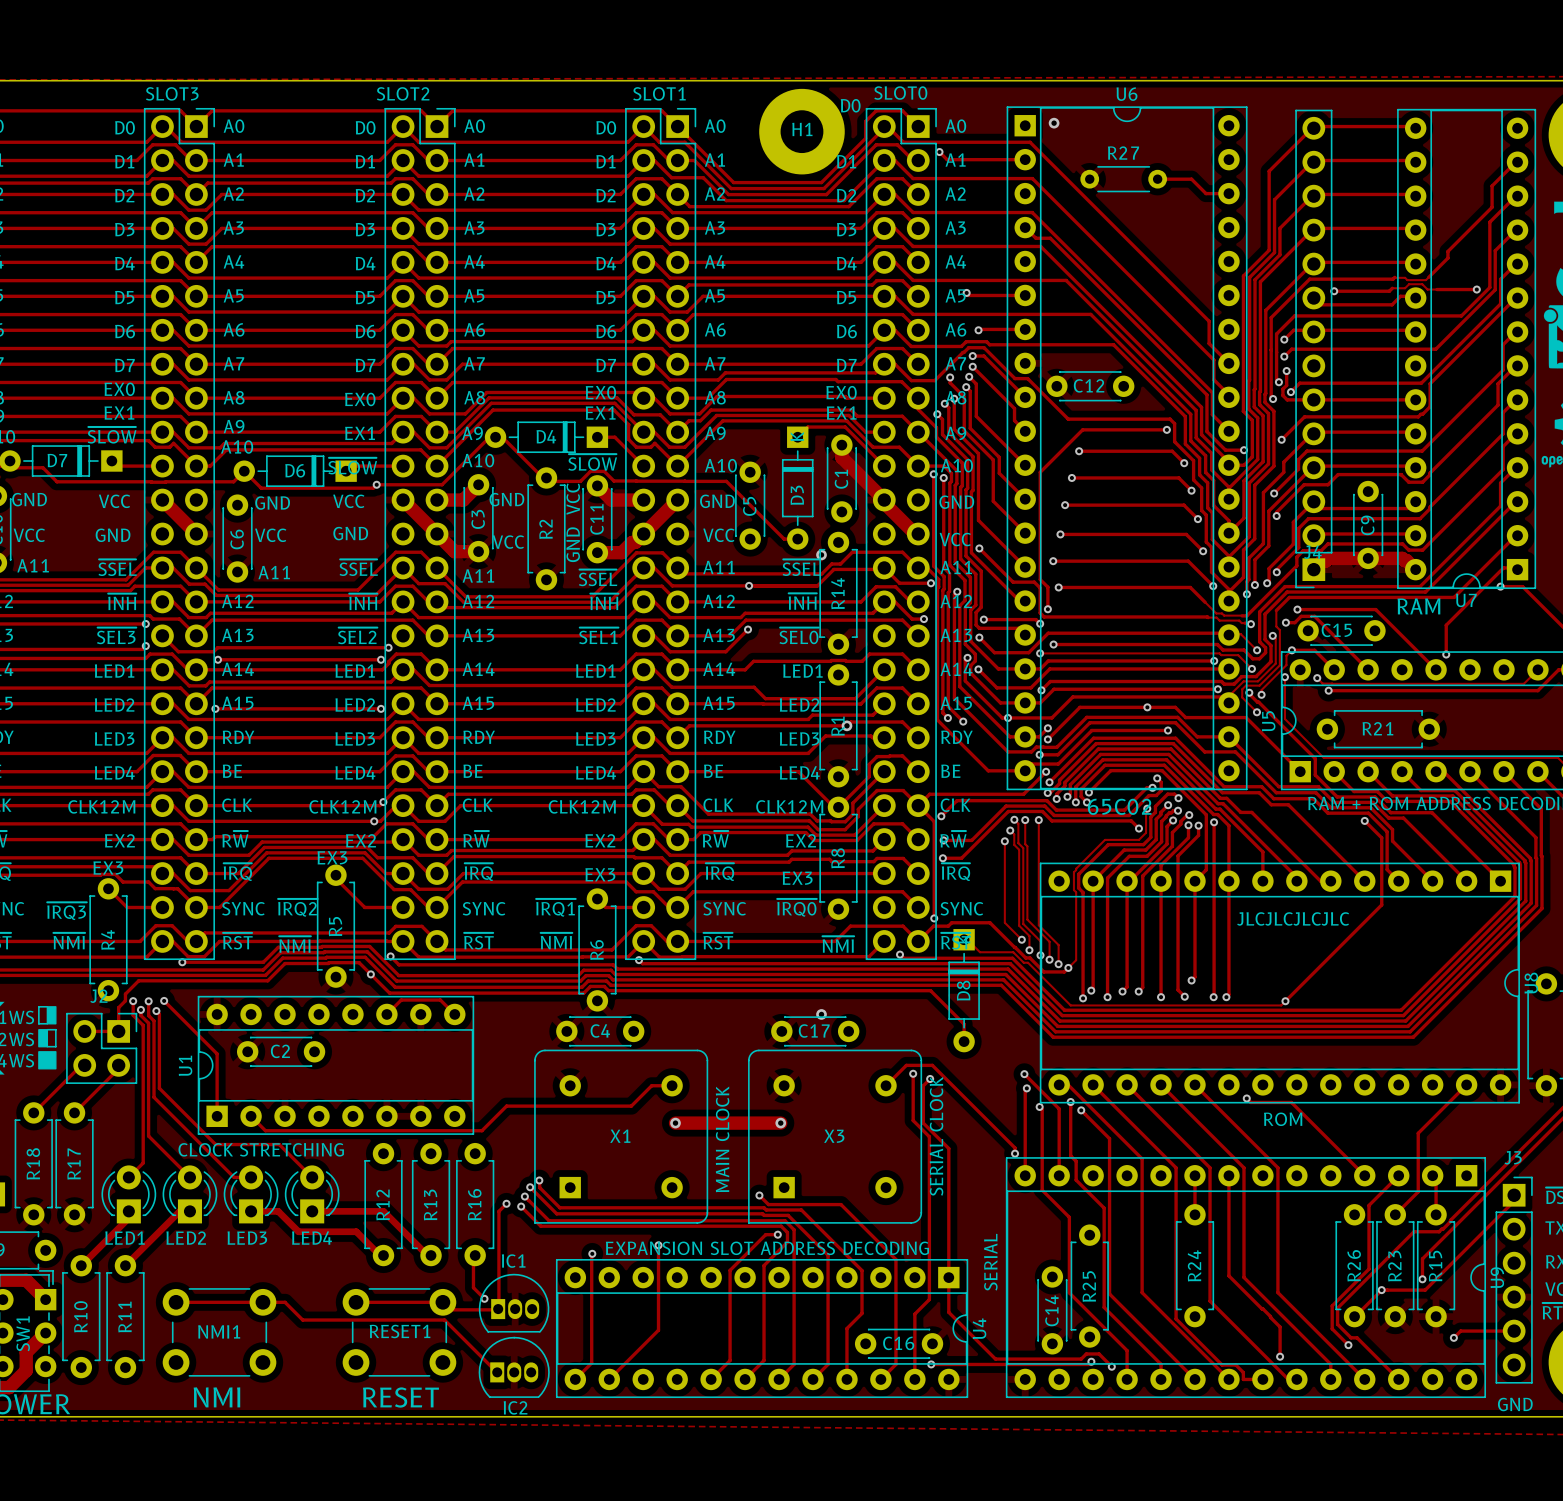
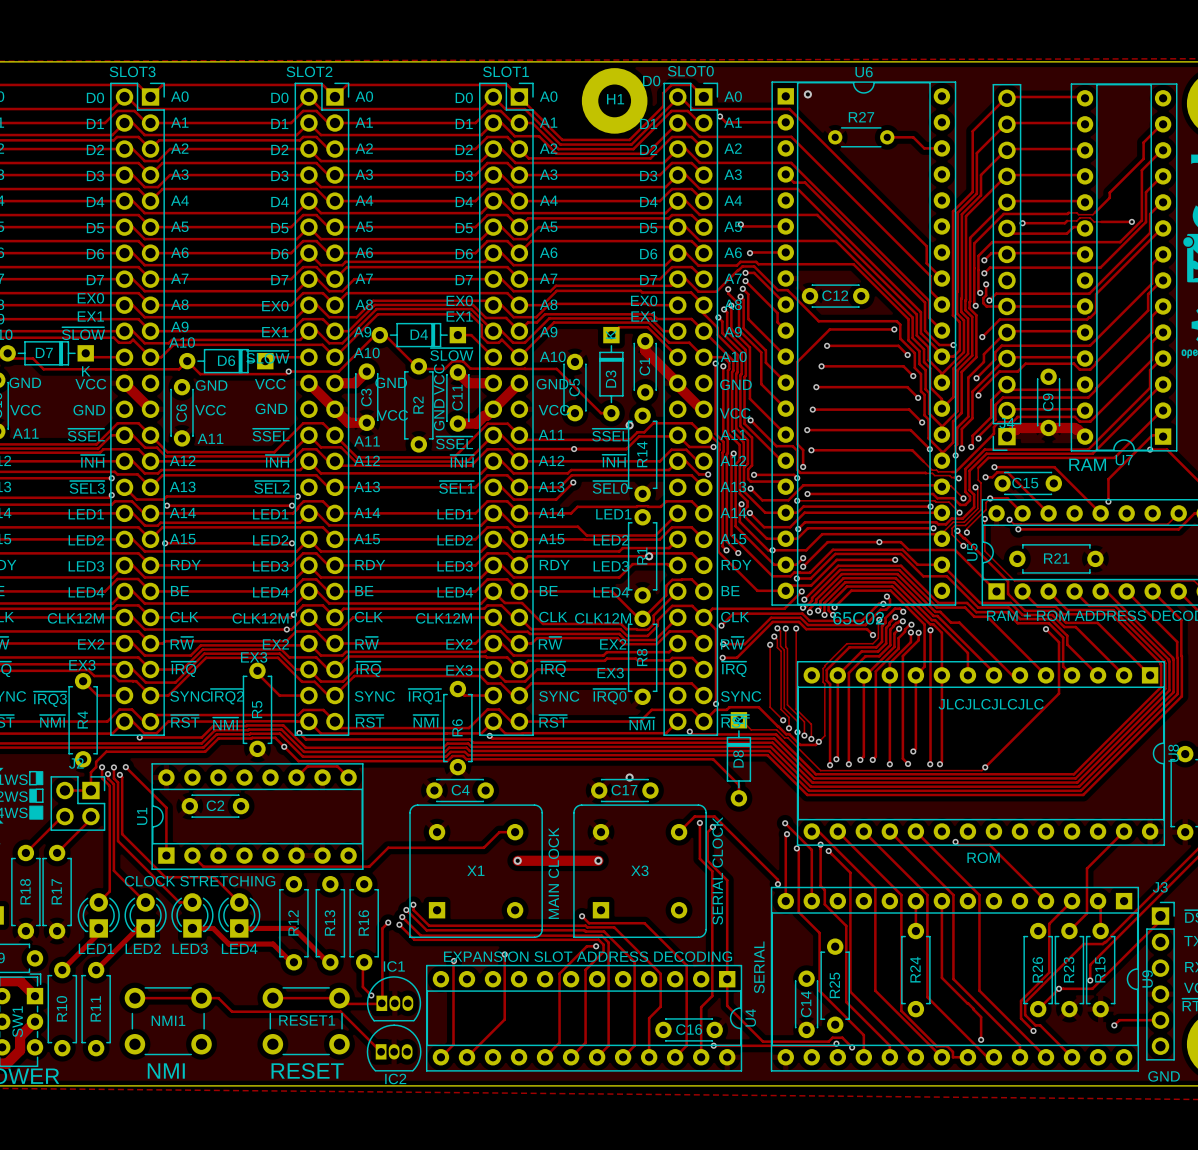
D7 text: none -> K (86, 371)

